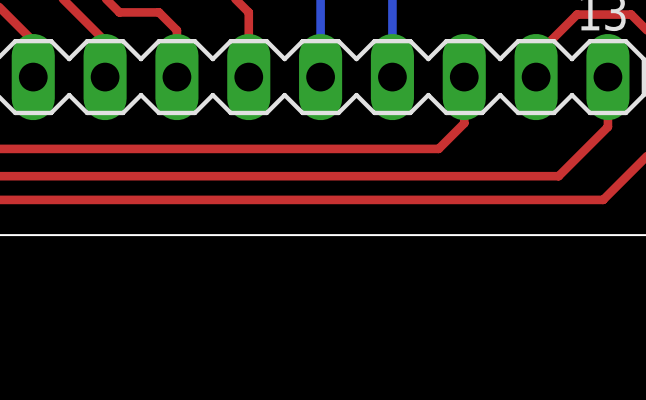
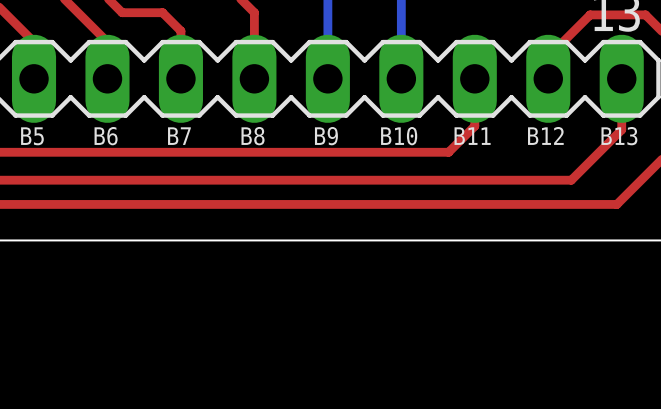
text: none -> B12 (545, 135)
text: none -> B5 (32, 136)
text: none -> B6 (106, 136)
text: none -> B7 (179, 136)
text: none -> B8 (253, 136)
text: none -> B9 (326, 136)
text: none -> B10 (399, 136)
text: none -> B11 (472, 136)
text: none -> B13 (619, 136)

